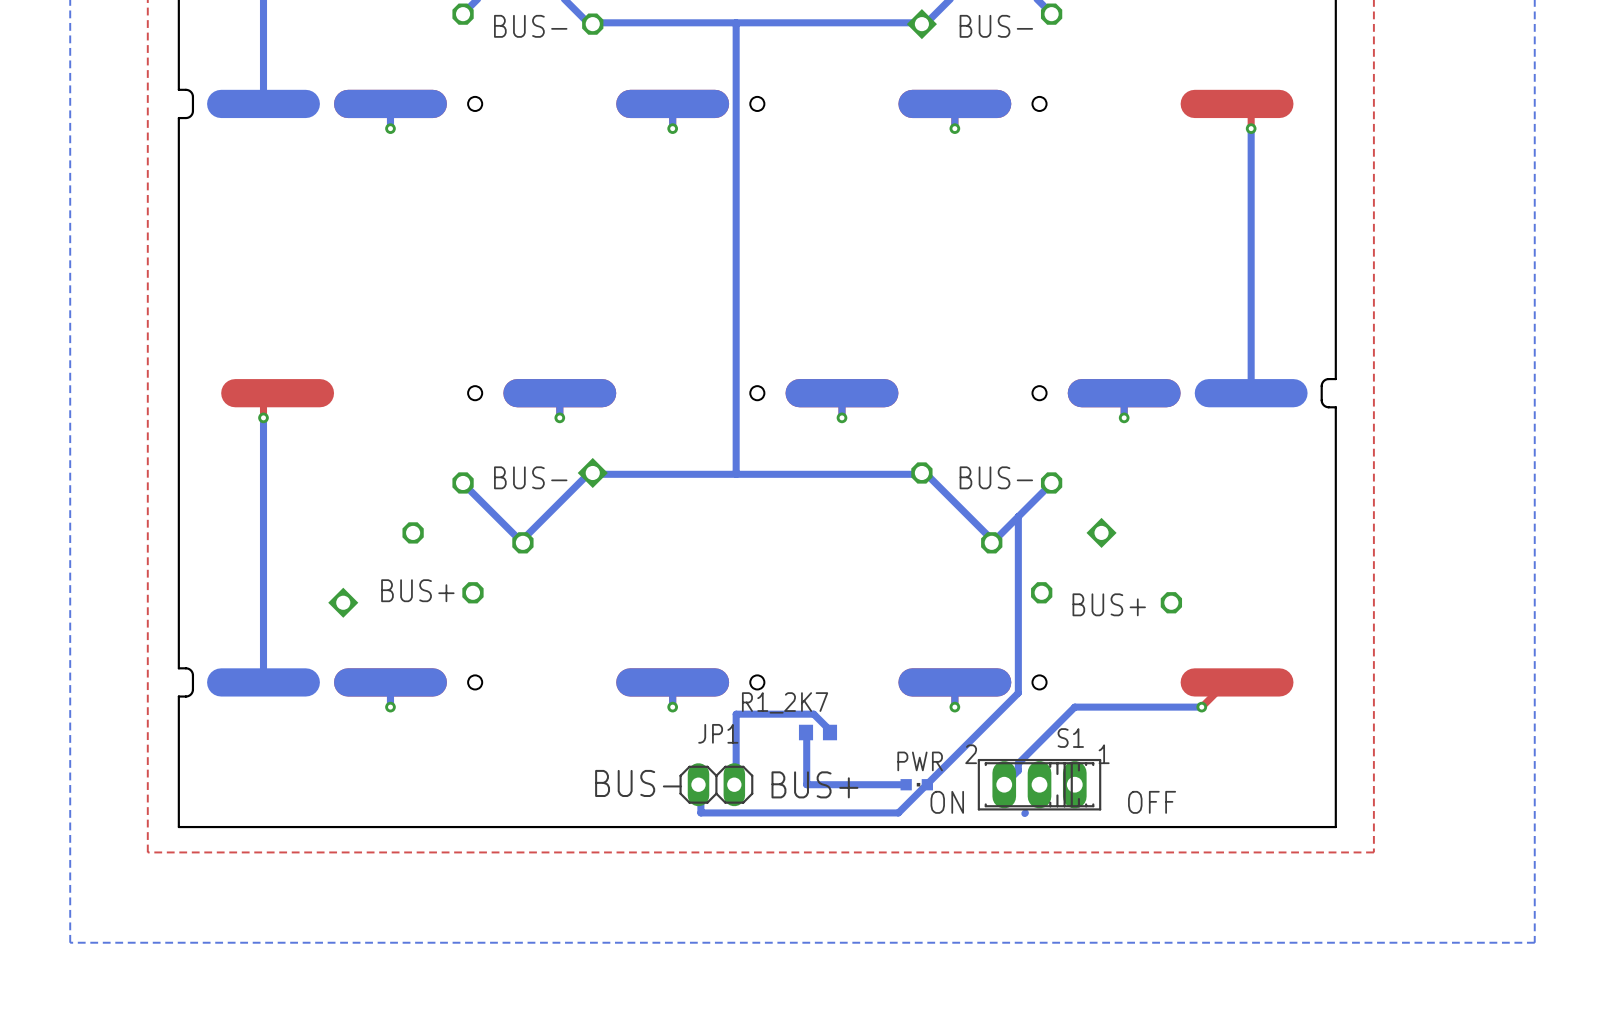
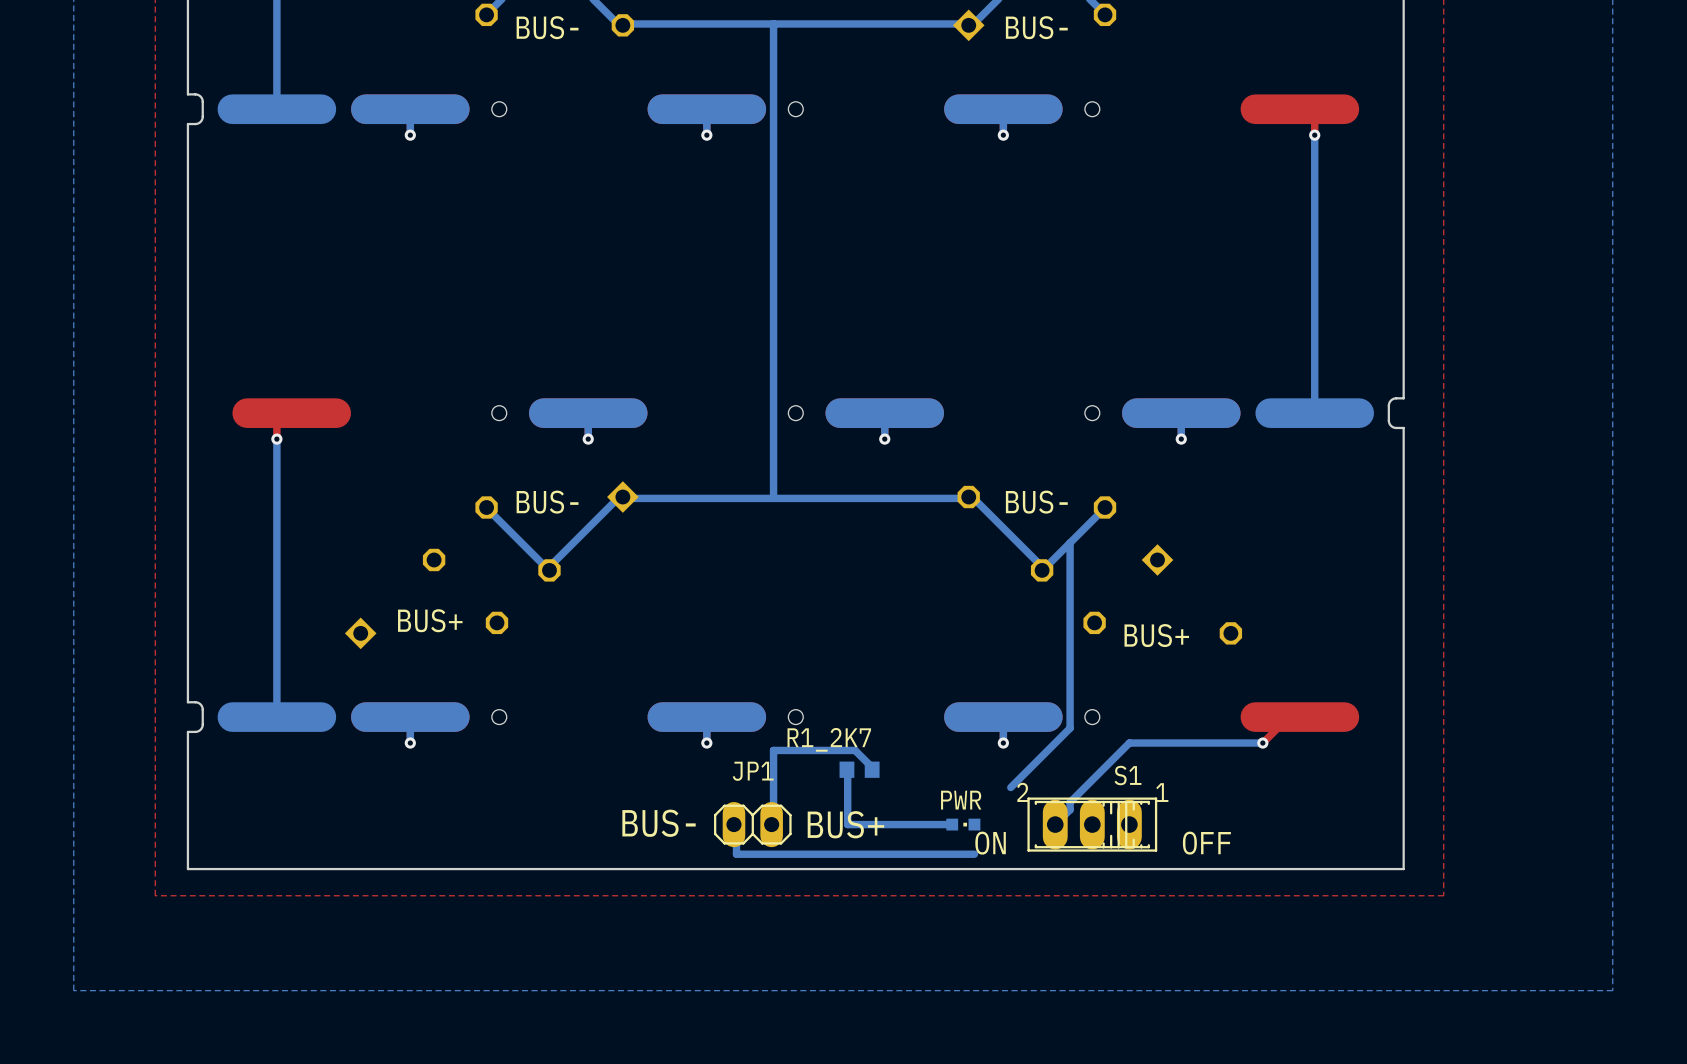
bottom track: (961, 749) (898, 812) -> (974, 854) (944, 854)
bottom track: (1025, 812) (1024, 813) -> none

